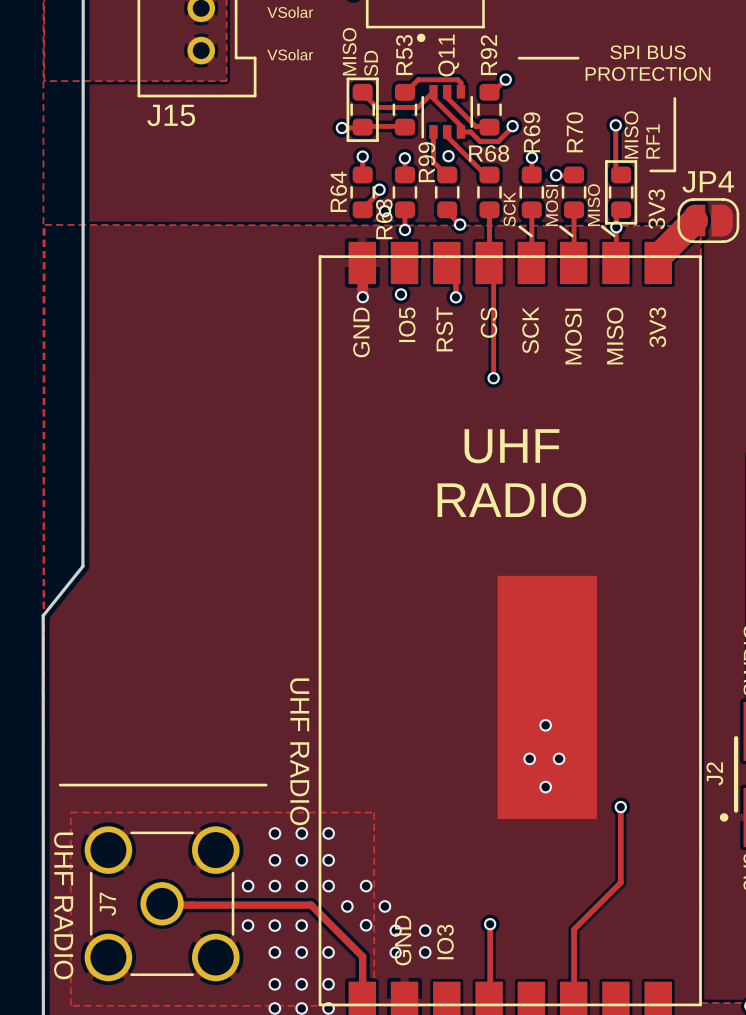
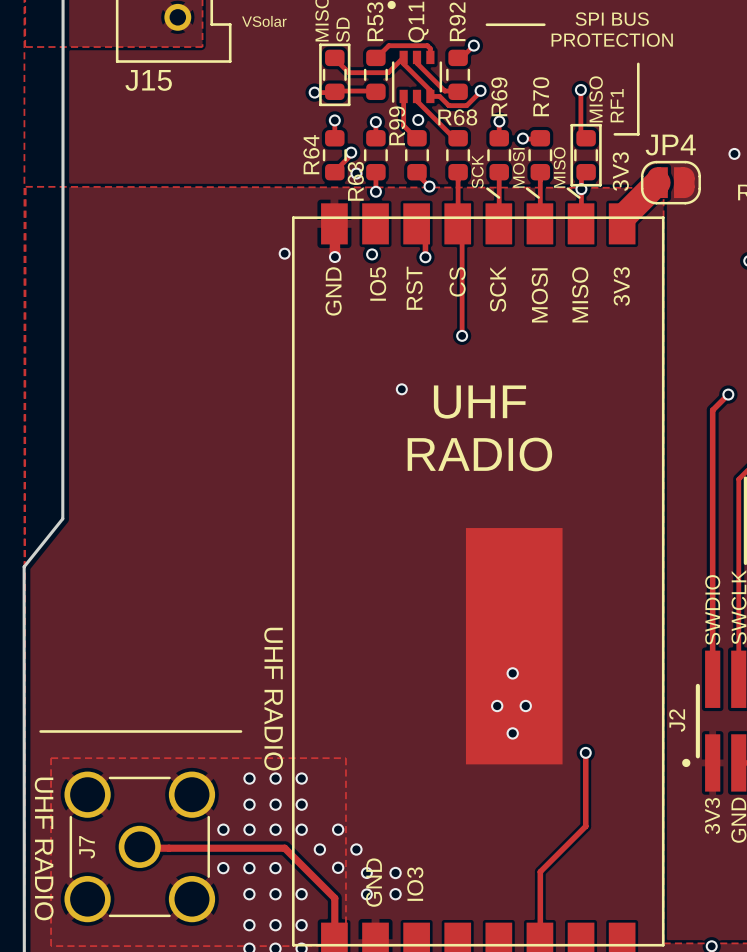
via: none -> (284, 253)
via: none -> (401, 389)
track: (490, 924) (490, 1001) -> none
via: (490, 924) -> none

